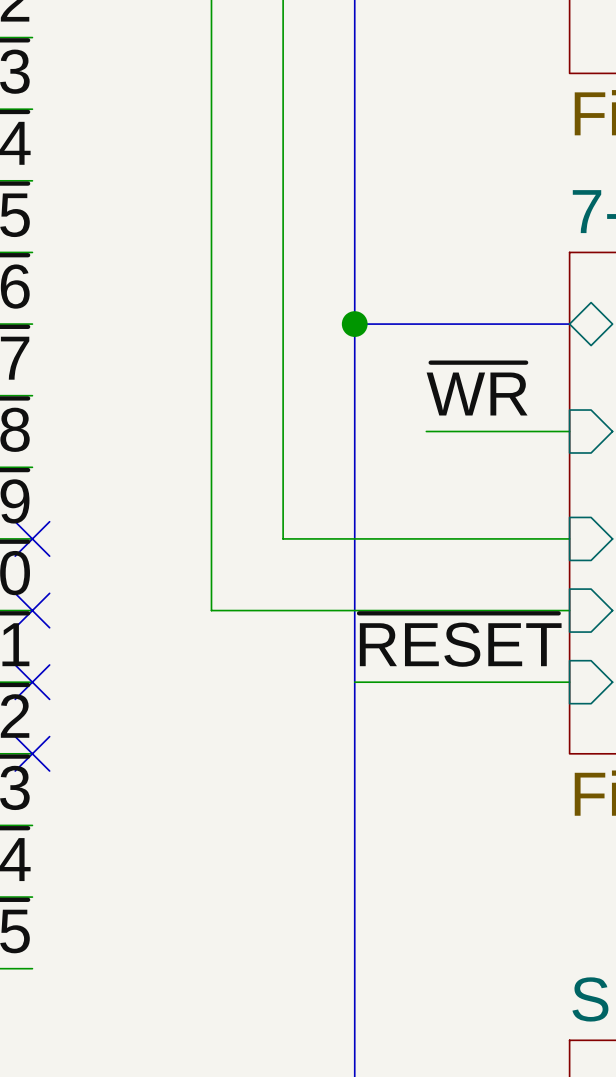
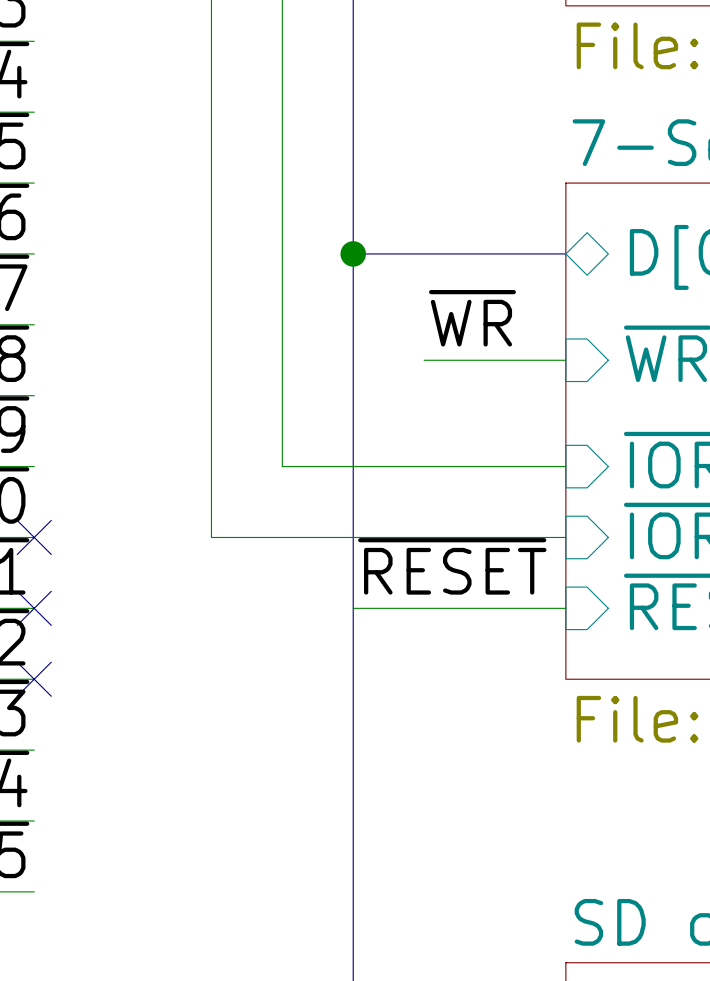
no-connect mark: (32, 538) -> none

